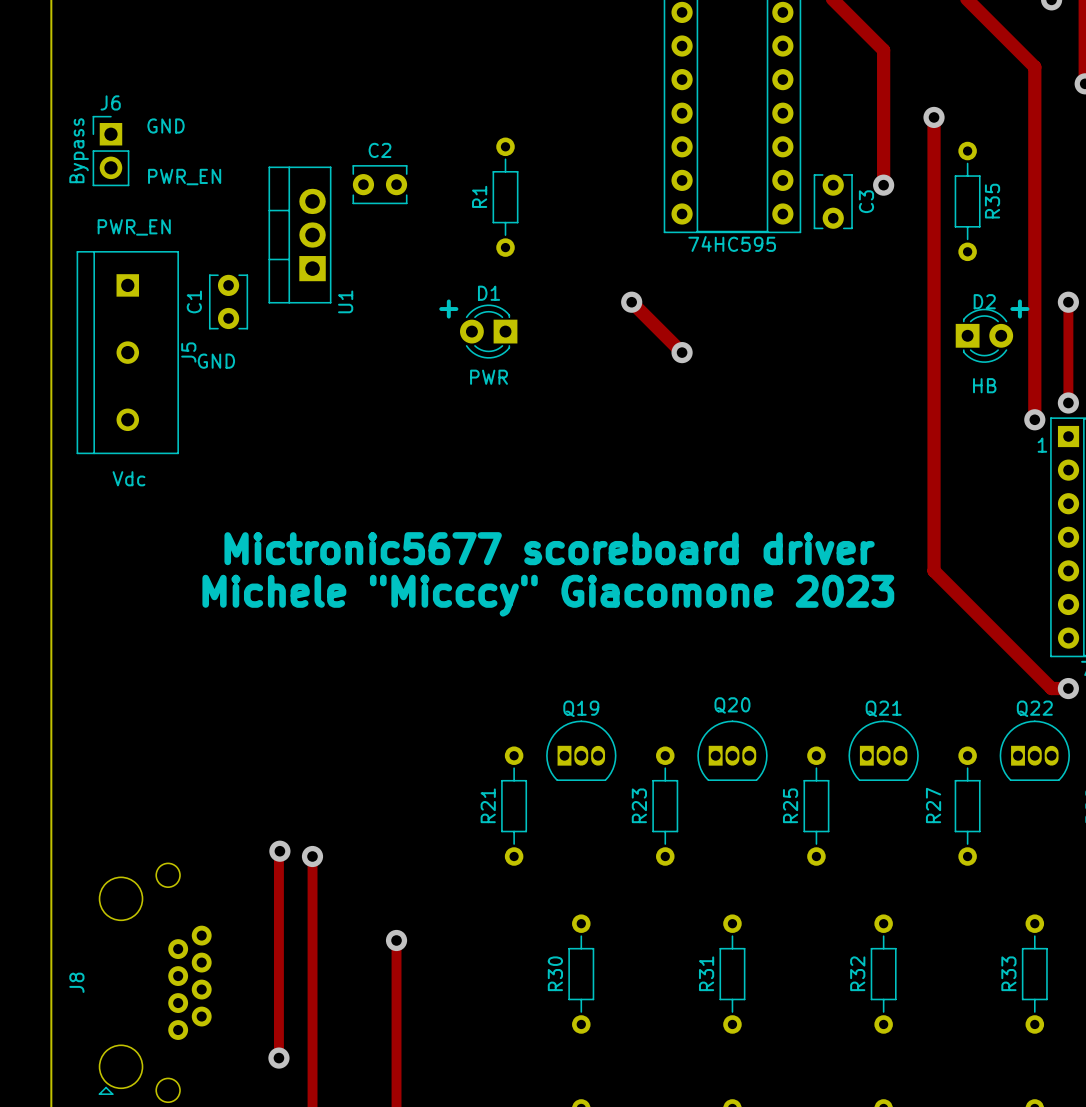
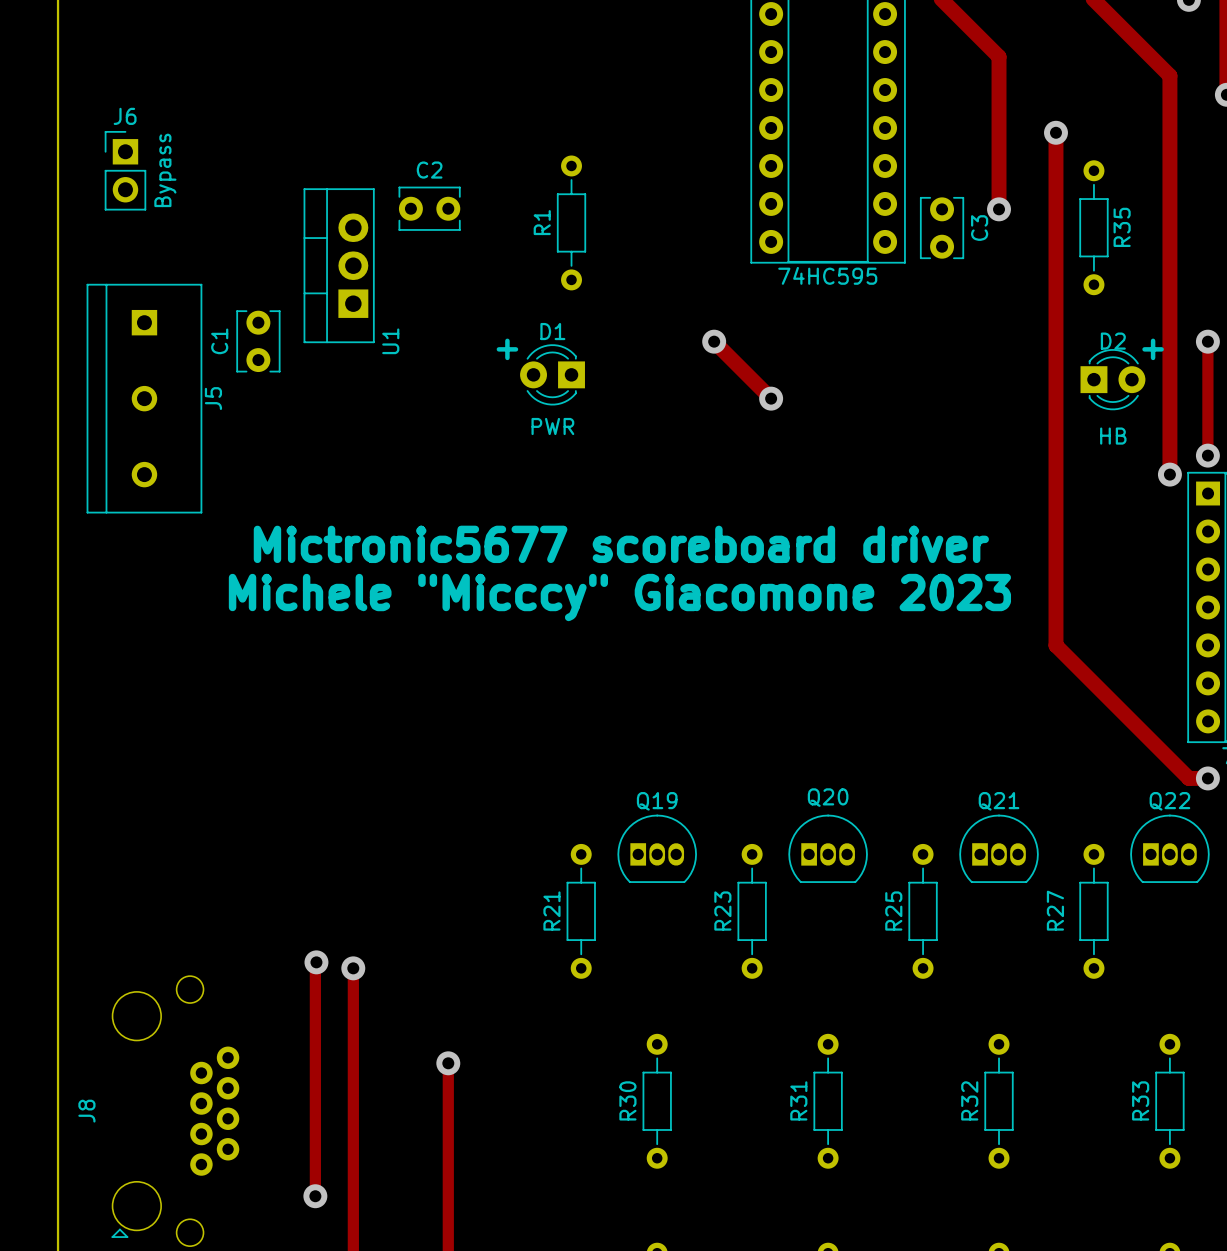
text: GND (166, 126) -> none
J6 value position: Bypass (79, 150) -> Bypass (165, 170)
text: PWR_EN (184, 177) -> none
text: PWR_EN (134, 227) -> none
text: GND (216, 361) -> none
text: 1 (1042, 445) -> none
text: Vdc (128, 478) -> none
text position: Mictronic5677 scoreboard driver (549, 548) -> Mictronic5677 scoreboard driver (621, 544)
text position: Michele "Micccy" Giacomone 2023 (548, 595) -> Michele "Micccy" Giacomone 2023 (619, 597)

